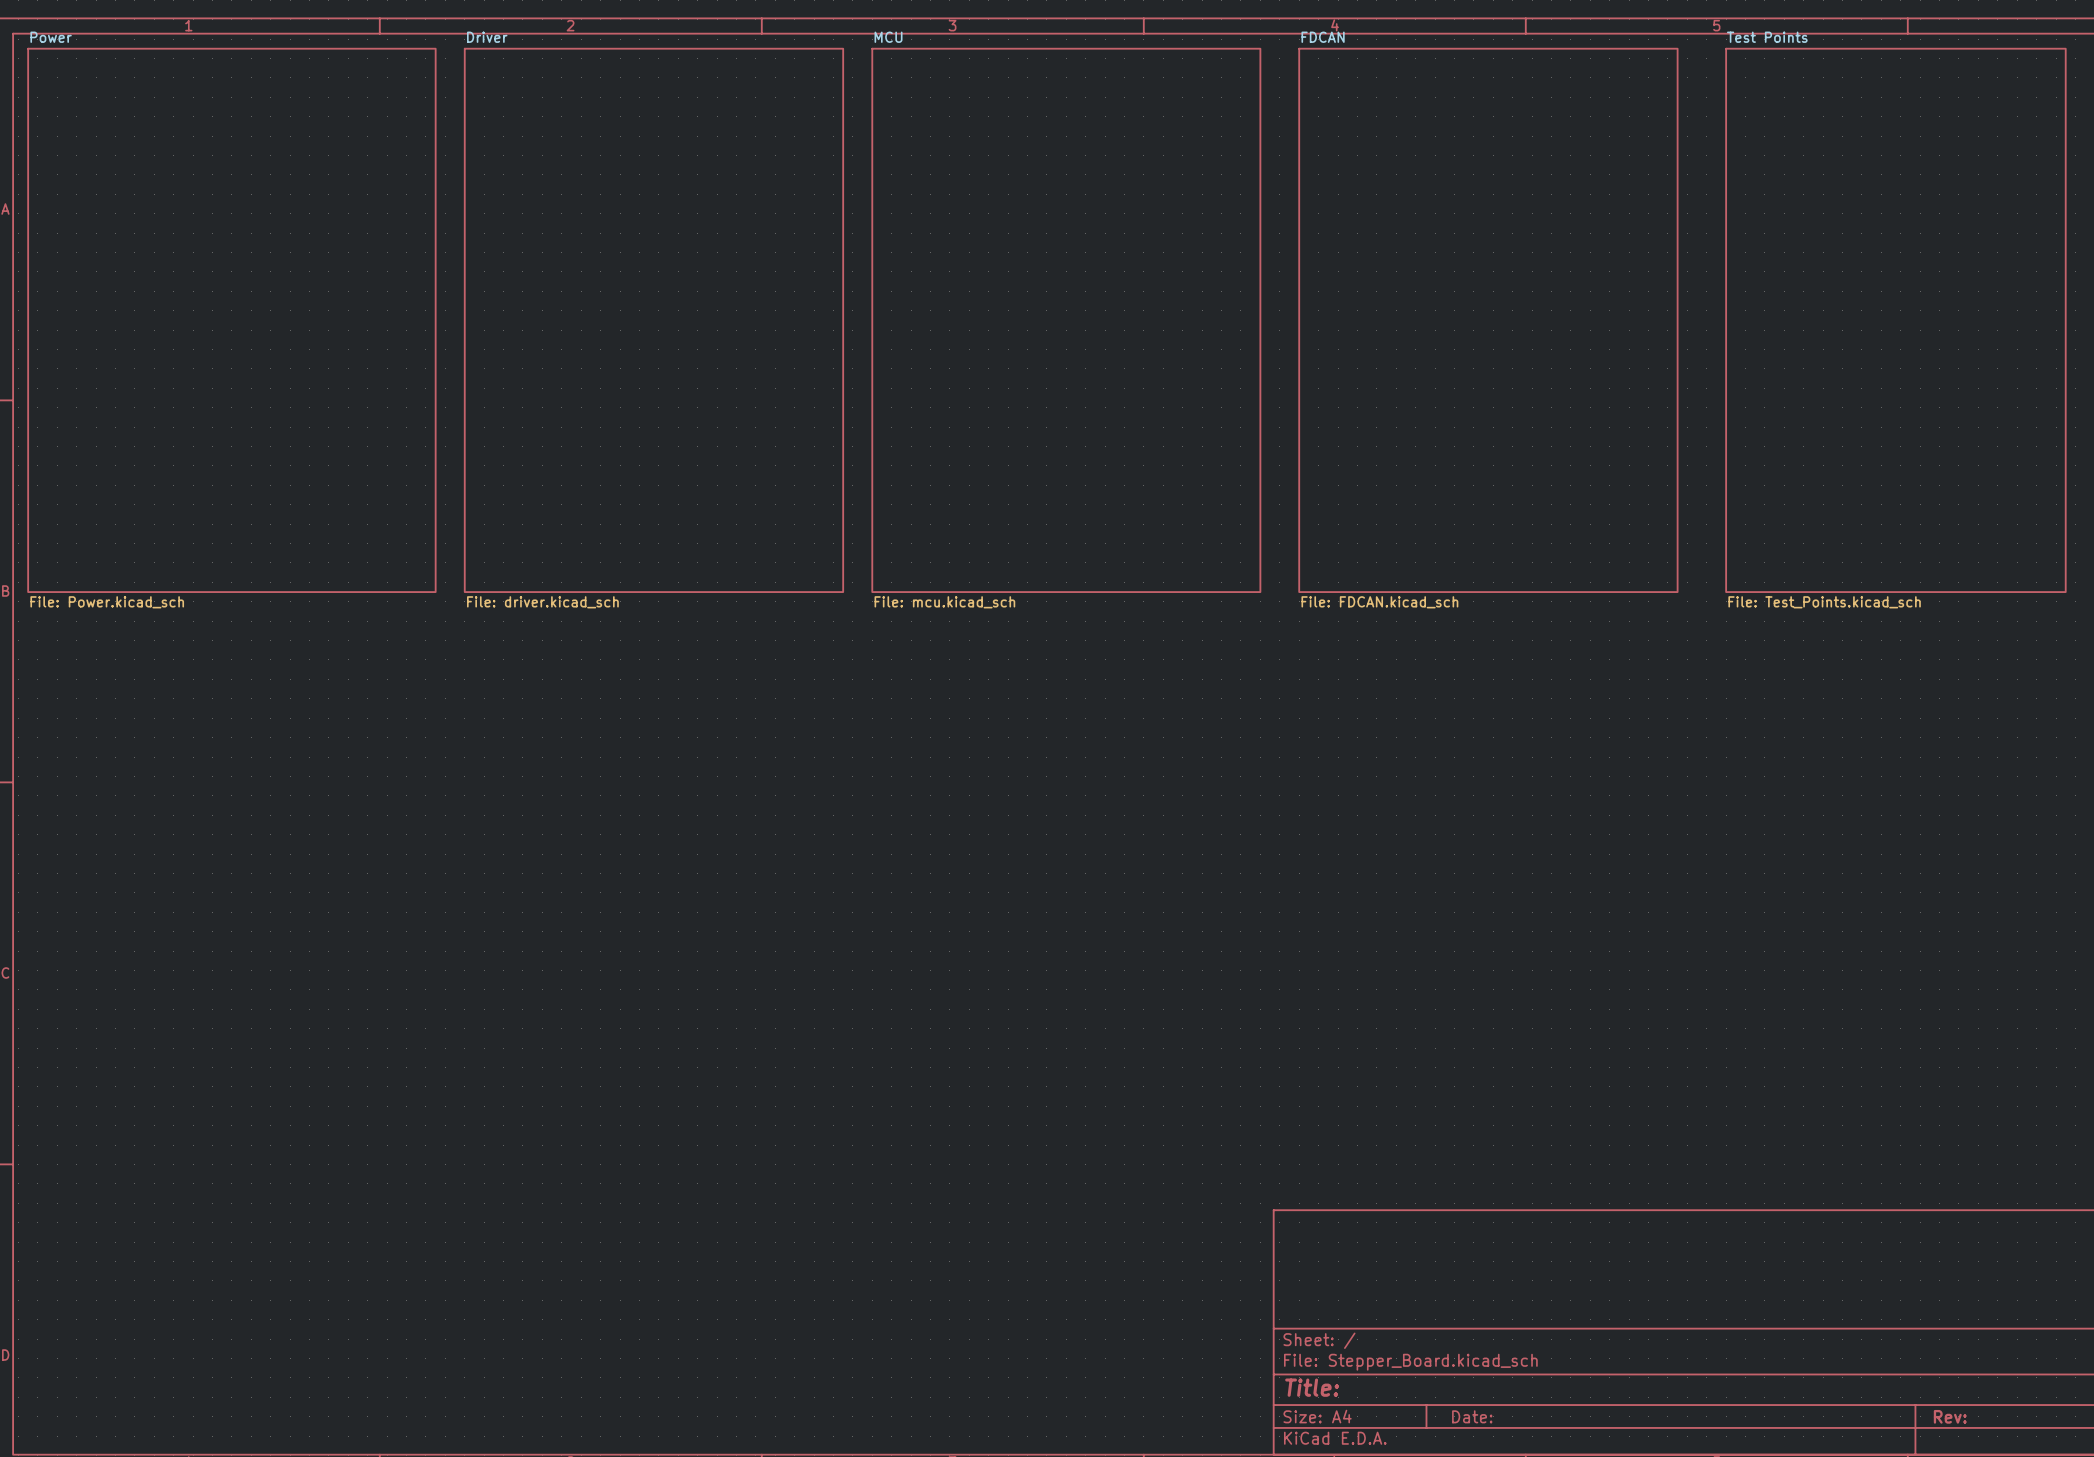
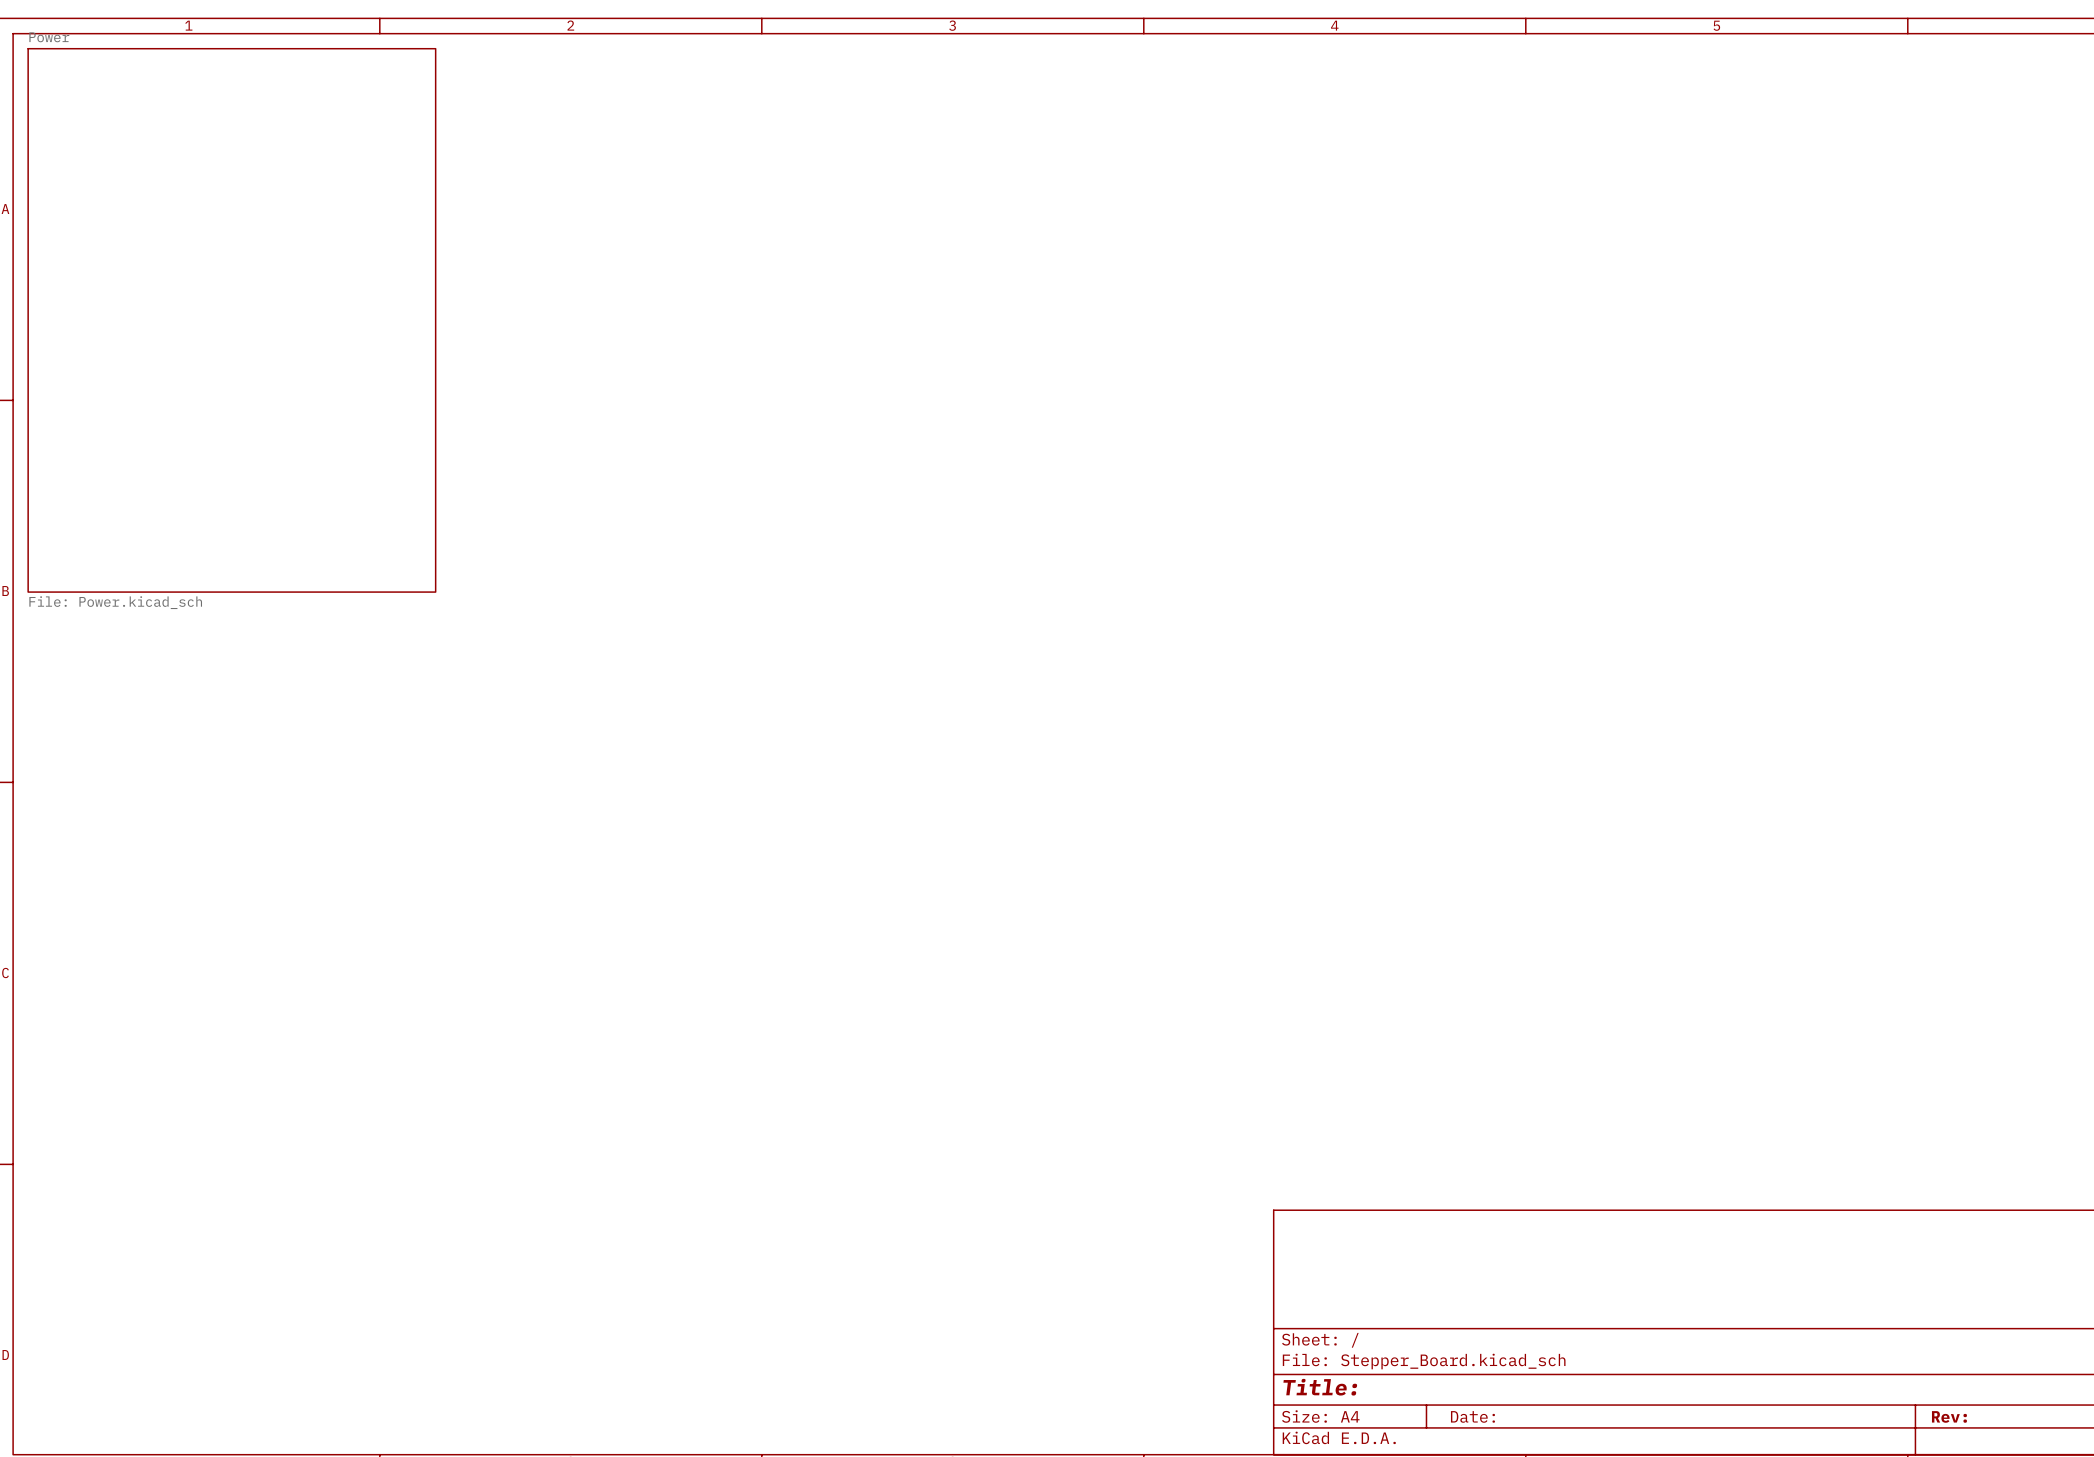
sheet Driver: File: driver.kicad_sch (653, 320) -> none
sheet MCU: File: mcu.kicad_sch (1066, 320) -> none
sheet FDCAN: File: FDCAN.kicad_sch (1488, 320) -> none
sheet Test Points: File: Test_Points.kicad_sch (1895, 320) -> none

